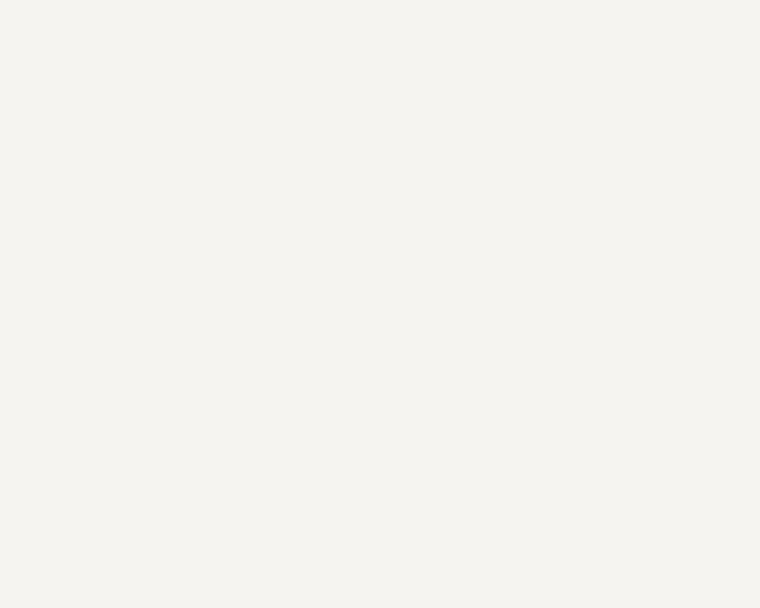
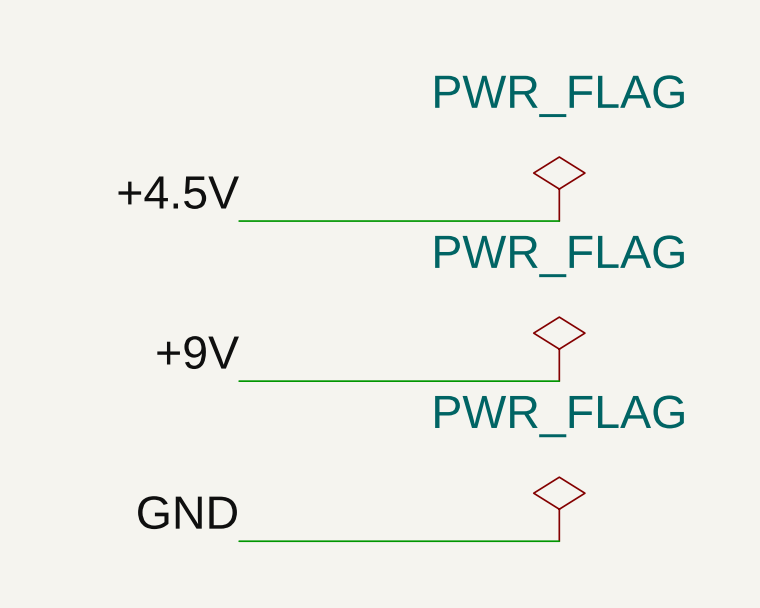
power symbol: none -> PWR_FLAG (559, 189)
label: none -> +4.5V (178, 192)
wire: none -> (239, 221) (559, 221)
power symbol: none -> PWR_FLAG (559, 349)
label: none -> +9V (198, 352)
wire: none -> (239, 381) (559, 381)
power symbol: none -> PWR_FLAG (559, 509)
label: none -> GND (187, 512)
wire: none -> (239, 541) (559, 541)

